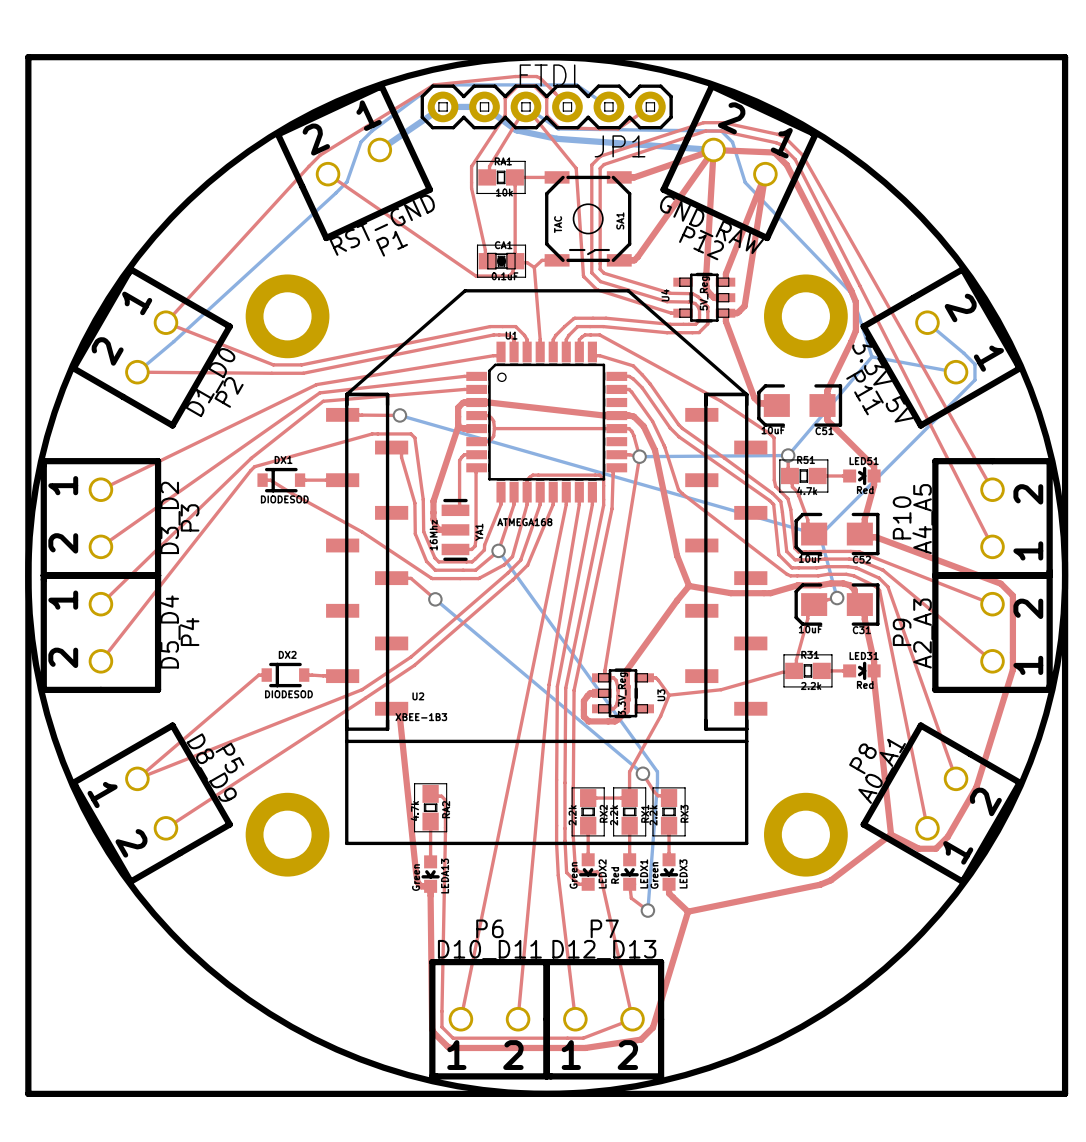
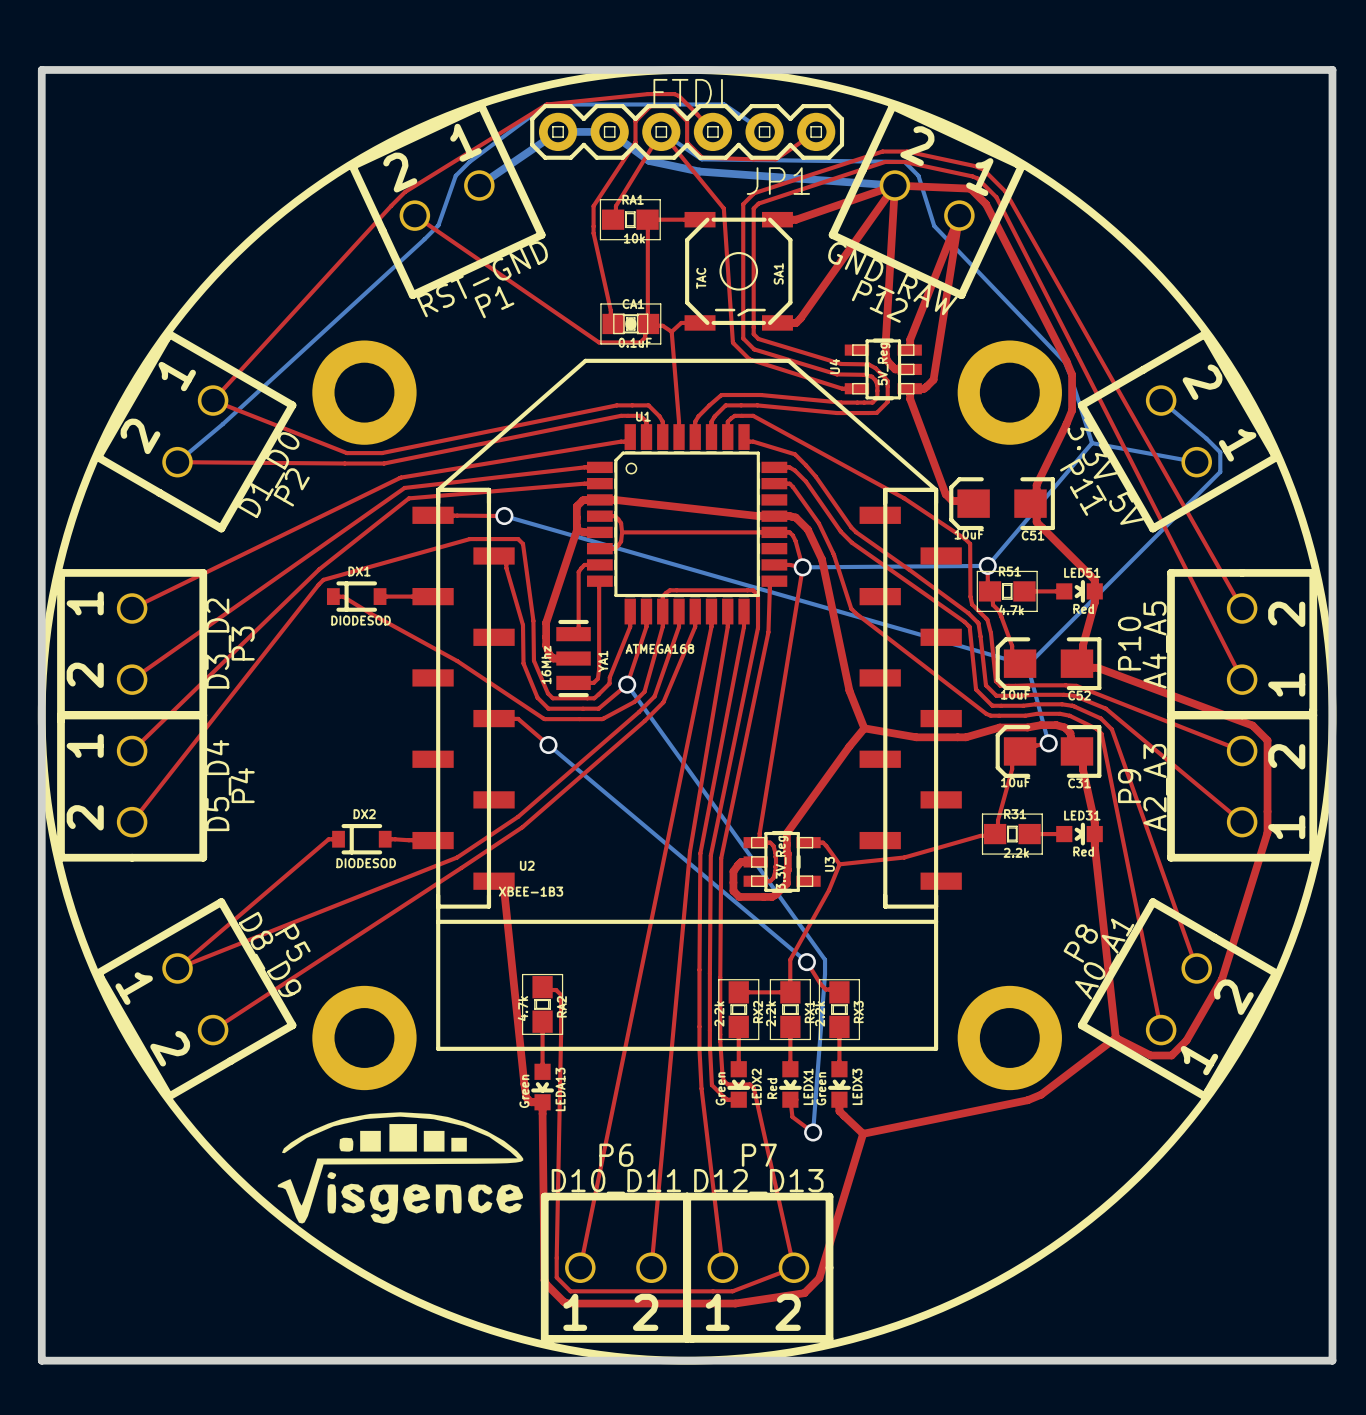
drawing: none -> [277, 1112, 524, 1224]

